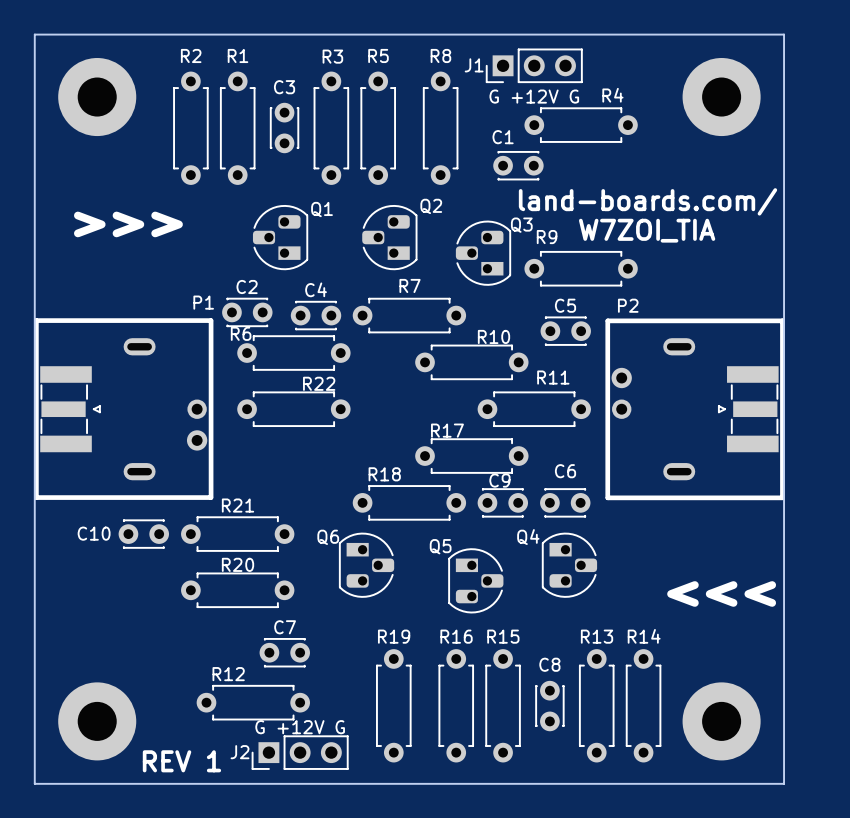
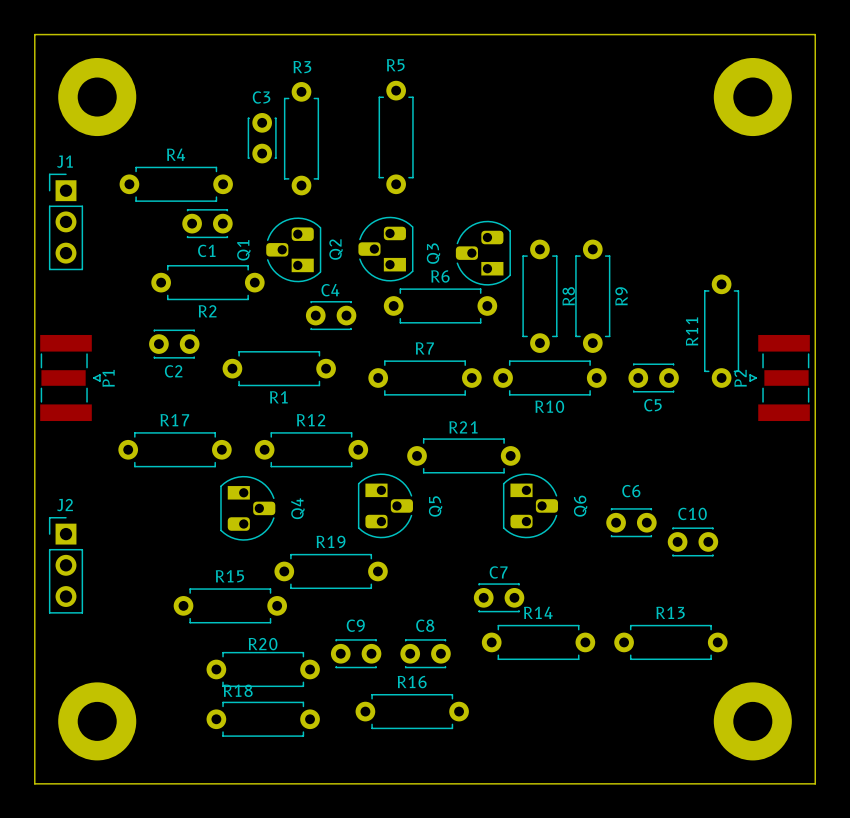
board edge: (784, 34) (784, 783) -> (784, 34) (815, 34) (815, 783) (784, 783)
R2 name position: R2 (191, 55) -> R2 (207, 311)
R1 name position: R1 (238, 55) -> R1 (278, 397)
R8 name rotation: 0° (440, 55) -> 90° counterclockwise (568, 296)
R8 name position: R8 (440, 55) -> R8 (568, 296)
J1 rotation: 0° (534, 65) -> 90° clockwise (66, 221)
J1 position: (534, 65) -> (66, 221)
R4 name position: R4 (612, 95) -> R4 (176, 154)
text: G +12V G (534, 96) -> none
part position: (721, 97) -> (752, 97)
R4 position: (581, 125) -> (176, 184)
R2 rotation: 0° (190, 128) -> 90° clockwise (207, 282)
R2 position: (190, 128) -> (207, 282)
R1 rotation: 0° (237, 128) -> 90° clockwise (279, 368)
R1 position: (237, 128) -> (279, 368)
C3 position: (284, 128) -> (262, 138)
R3 position: (331, 128) -> (301, 138)
R5 position: (378, 128) -> (396, 137)
R8 position: (440, 128) -> (539, 296)
C1 name position: C1 (503, 137) -> C1 (206, 250)
C1 position: (518, 165) -> (207, 223)
text: land-boards.com/ (647, 201) -> none
Q2 name rotation: 0° (431, 206) -> 90° counterclockwise (336, 249)
Q2 name position: Q2 (431, 206) -> Q2 (336, 249)
Q1 name rotation: 0° (322, 209) -> 90° counterclockwise (243, 250)
Q1 name position: Q1 (322, 209) -> Q1 (243, 250)
text: >>> (128, 224) -> none
Q3 name rotation: 0° (521, 225) -> 90° counterclockwise (433, 253)
Q3 name position: Q3 (521, 225) -> Q3 (433, 253)
text: W7ZOI_TIA (647, 230) -> none
Q1 position: (280, 237) -> (293, 249)
Q2 position: (389, 237) -> (385, 249)
R9 name position: R9 (547, 237) -> R9 (621, 296)
R9 rotation: 0° (581, 268) -> 90° clockwise (592, 296)
C2 name position: C2 (247, 287) -> C2 (173, 371)
P1 name rotation: 0° (203, 302) -> 90° counterclockwise (108, 378)
P1 name position: P1 (203, 302) -> P1 (108, 378)
C5 name position: C5 (565, 305) -> C5 (652, 405)
P2 name rotation: 0° (628, 305) -> 90° counterclockwise (740, 378)
P2 name position: P2 (628, 305) -> P2 (740, 378)
C2 position: (247, 312) -> (174, 344)
C4 position: (316, 315) -> (331, 315)
R7 position: (409, 315) -> (425, 378)
C5 position: (565, 331) -> (653, 378)
R6 name position: R6 (241, 333) -> R6 (440, 276)
R10 name position: R10 (493, 336) -> R10 (549, 406)
R6 position: (293, 353) -> (440, 305)
R10 position: (471, 362) -> (549, 378)
R11 name position: R11 (553, 377) -> R11 (692, 331)
P1 position: (70, 409) -> (70, 378)
part: (123, 409) -> none
R22: (293, 409) -> none
R11 rotation: 0° (534, 409) -> 90° clockwise (721, 331)
R11 position: (534, 409) -> (721, 331)
part: (695, 409) -> none
P2 position: (748, 409) -> (779, 378)
R17 name position: R17 (447, 430) -> R17 (174, 420)
R17 position: (471, 456) -> (175, 449)
C9 name position: C9 (499, 480) -> C9 (355, 625)
R18 position: (409, 502) -> (263, 719)
C9 position: (502, 502) -> (356, 653)
C6 position: (565, 502) -> (631, 522)
C10 name position: C10 (94, 533) -> C10 (692, 513)
C10 position: (143, 534) -> (692, 541)
R21 position: (237, 534) -> (463, 455)
Q6 name rotation: 0° (328, 537) -> 90° counterclockwise (580, 506)
Q6 name position: Q6 (328, 537) -> Q6 (580, 506)
Q4 name rotation: 0° (528, 537) -> 90° counterclockwise (297, 508)
Q4 name position: Q4 (528, 537) -> Q4 (297, 508)
Q5 name rotation: 0° (440, 546) -> 90° counterclockwise (435, 506)
Q5 name position: Q5 (440, 546) -> Q5 (435, 506)
Q6 position: (366, 565) -> (530, 505)
Q4 position: (569, 565) -> (247, 508)
Q5 position: (475, 580) -> (385, 505)
R20 position: (237, 590) -> (263, 669)
text: >>> (721, 593) -> none
R19 name position: R19 (394, 636) -> R19 (331, 541)
R16 name position: R16 (456, 636) -> R16 (412, 682)
R15 name position: R15 (503, 636) -> R15 (229, 576)
R13 name position: R13 (597, 636) -> R13 (670, 612)
R14 name position: R14 (644, 636) -> R14 (538, 612)
C7 position: (284, 652) -> (499, 597)
R12 name position: R12 (228, 674) -> R12 (311, 420)
R12 position: (253, 702) -> (311, 449)
R19 rotation: 0° (393, 705) -> 90° clockwise (331, 571)
R19 position: (393, 705) -> (331, 571)
R16 rotation: 0° (456, 705) -> 90° clockwise (412, 711)
R15 rotation: 0° (503, 705) -> 90° clockwise (230, 605)
R15 position: (503, 705) -> (230, 605)
R13 rotation: 0° (596, 705) -> 90° clockwise (670, 642)
R13 position: (596, 705) -> (670, 642)
R14 rotation: 0° (643, 705) -> 90° clockwise (538, 642)
R14 position: (643, 705) -> (538, 642)
C8 rotation: 0° (549, 706) -> 90° clockwise (425, 653)
C8 position: (549, 706) -> (425, 653)
part position: (721, 721) -> (752, 721)
text: G +12V G (300, 727) -> none
J2 rotation: 0° (300, 752) -> 90° clockwise (66, 565)
J2 position: (300, 752) -> (66, 565)
text: REV 1 (181, 761) -> none

